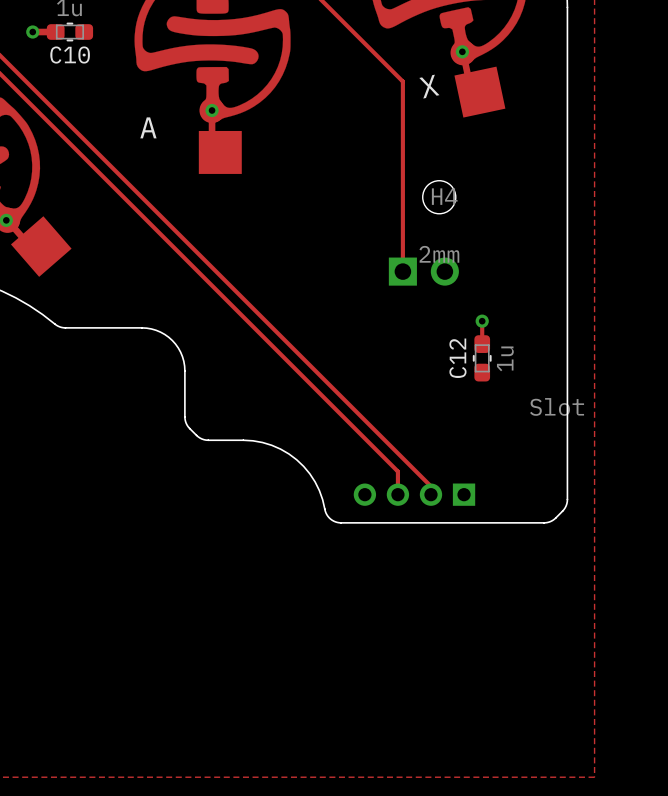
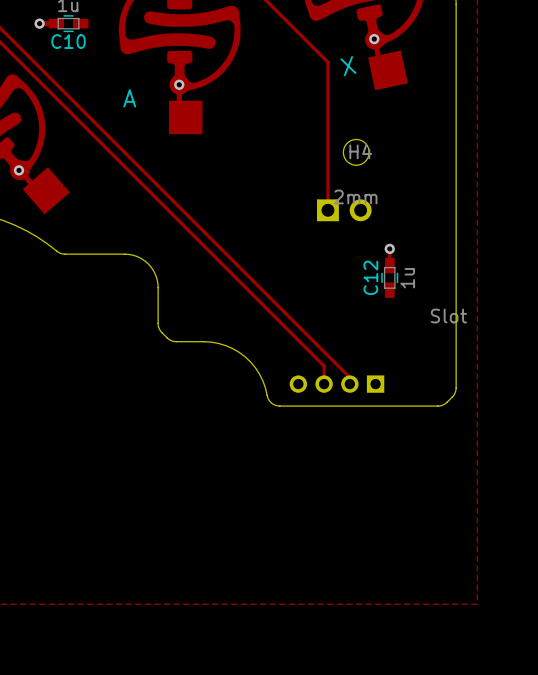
C10 footprint: [46, 22, 94, 42] -> [48, 15, 89, 33]
C12 footprint: [472, 335, 492, 382] -> [381, 257, 399, 298]

